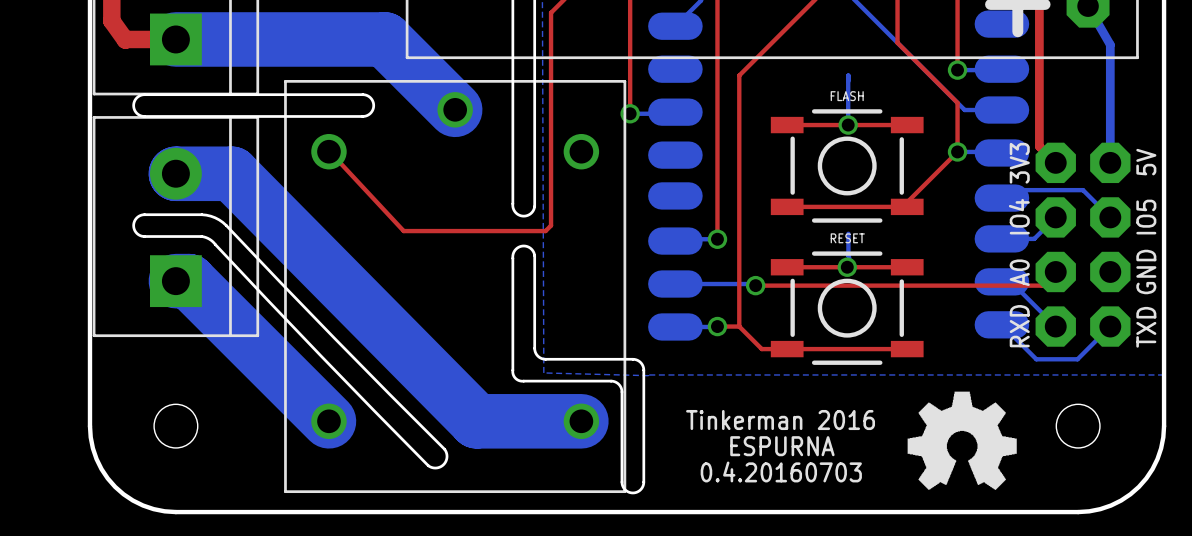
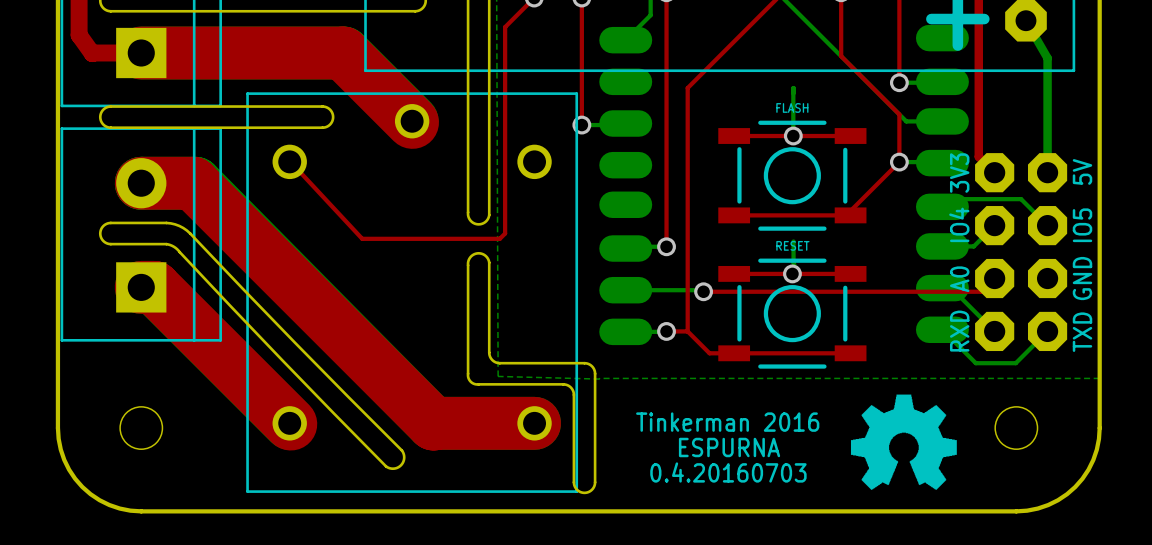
top track: none -> (141, 53) (343, 53) (412, 122)
top track: none -> (141, 183) (192, 183) (433, 424) (534, 423)
top track: none -> (141, 287) (154, 287) (290, 424)

